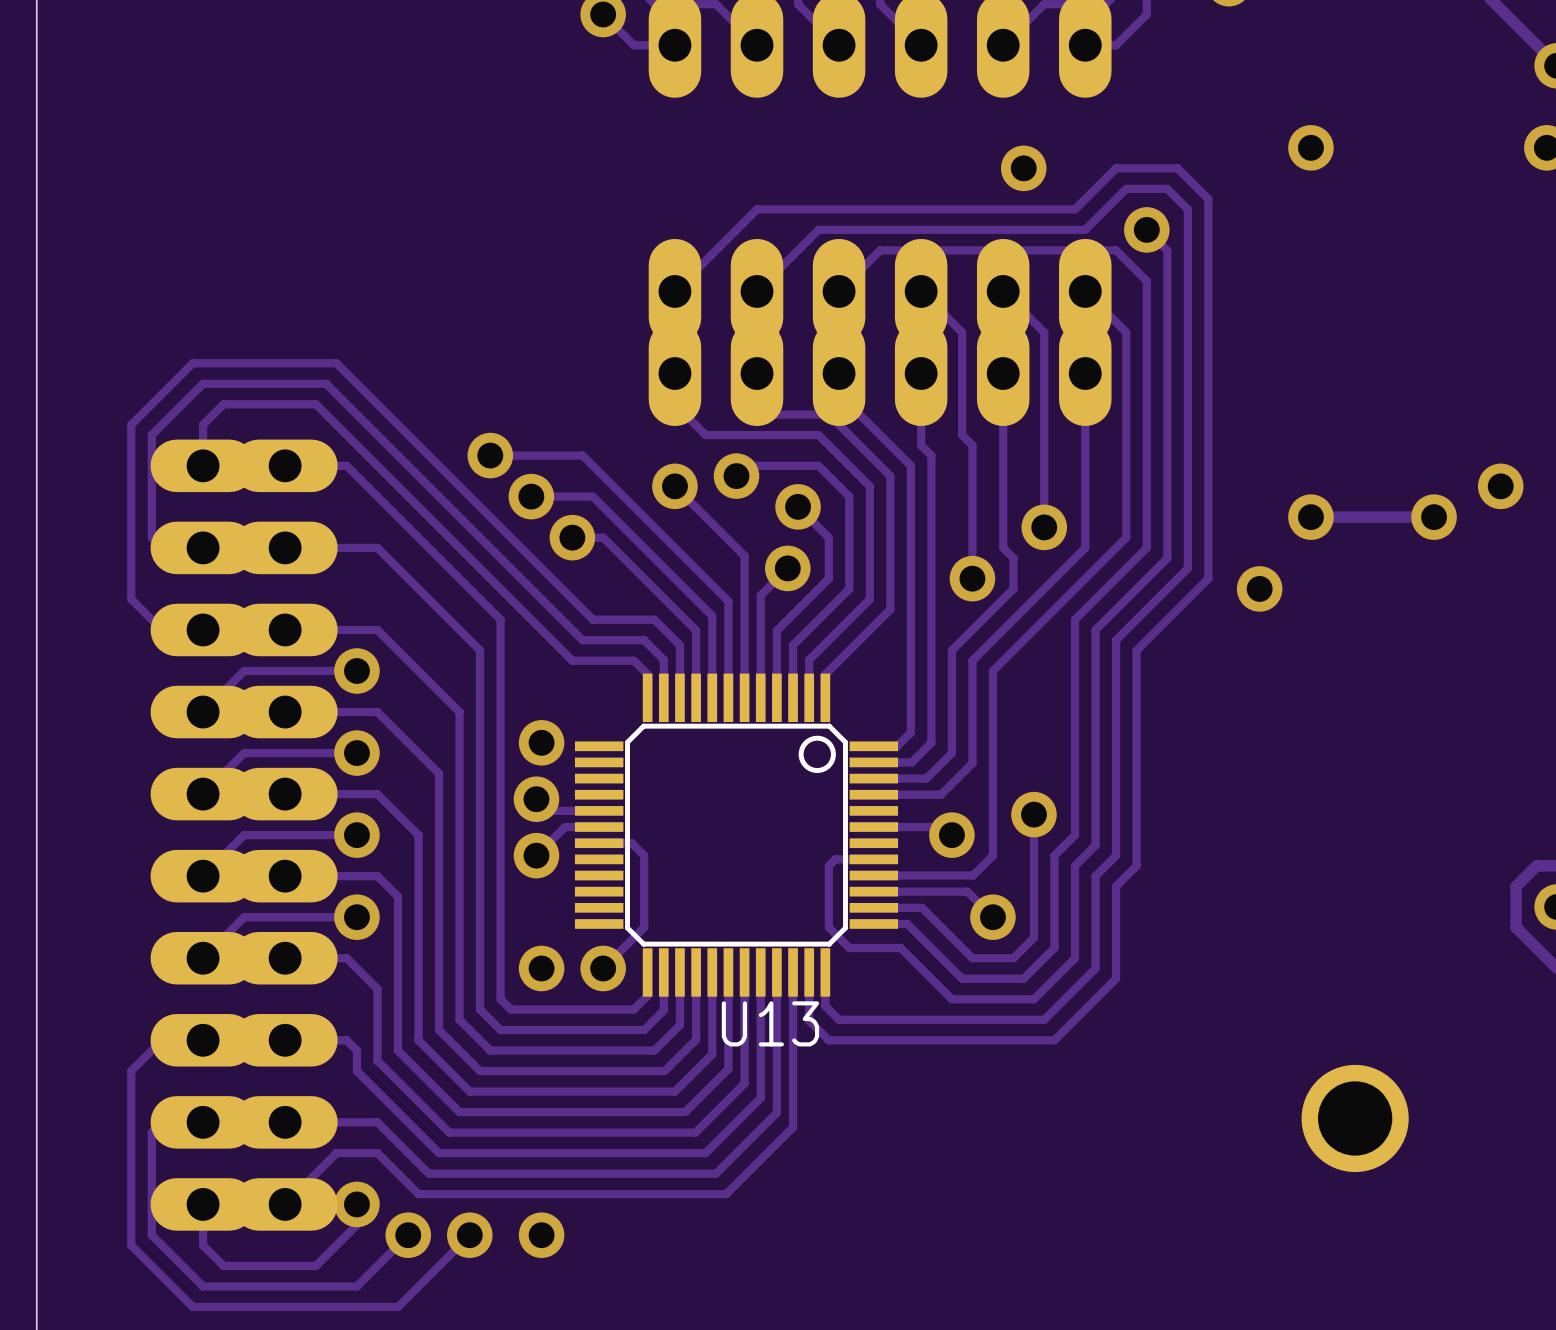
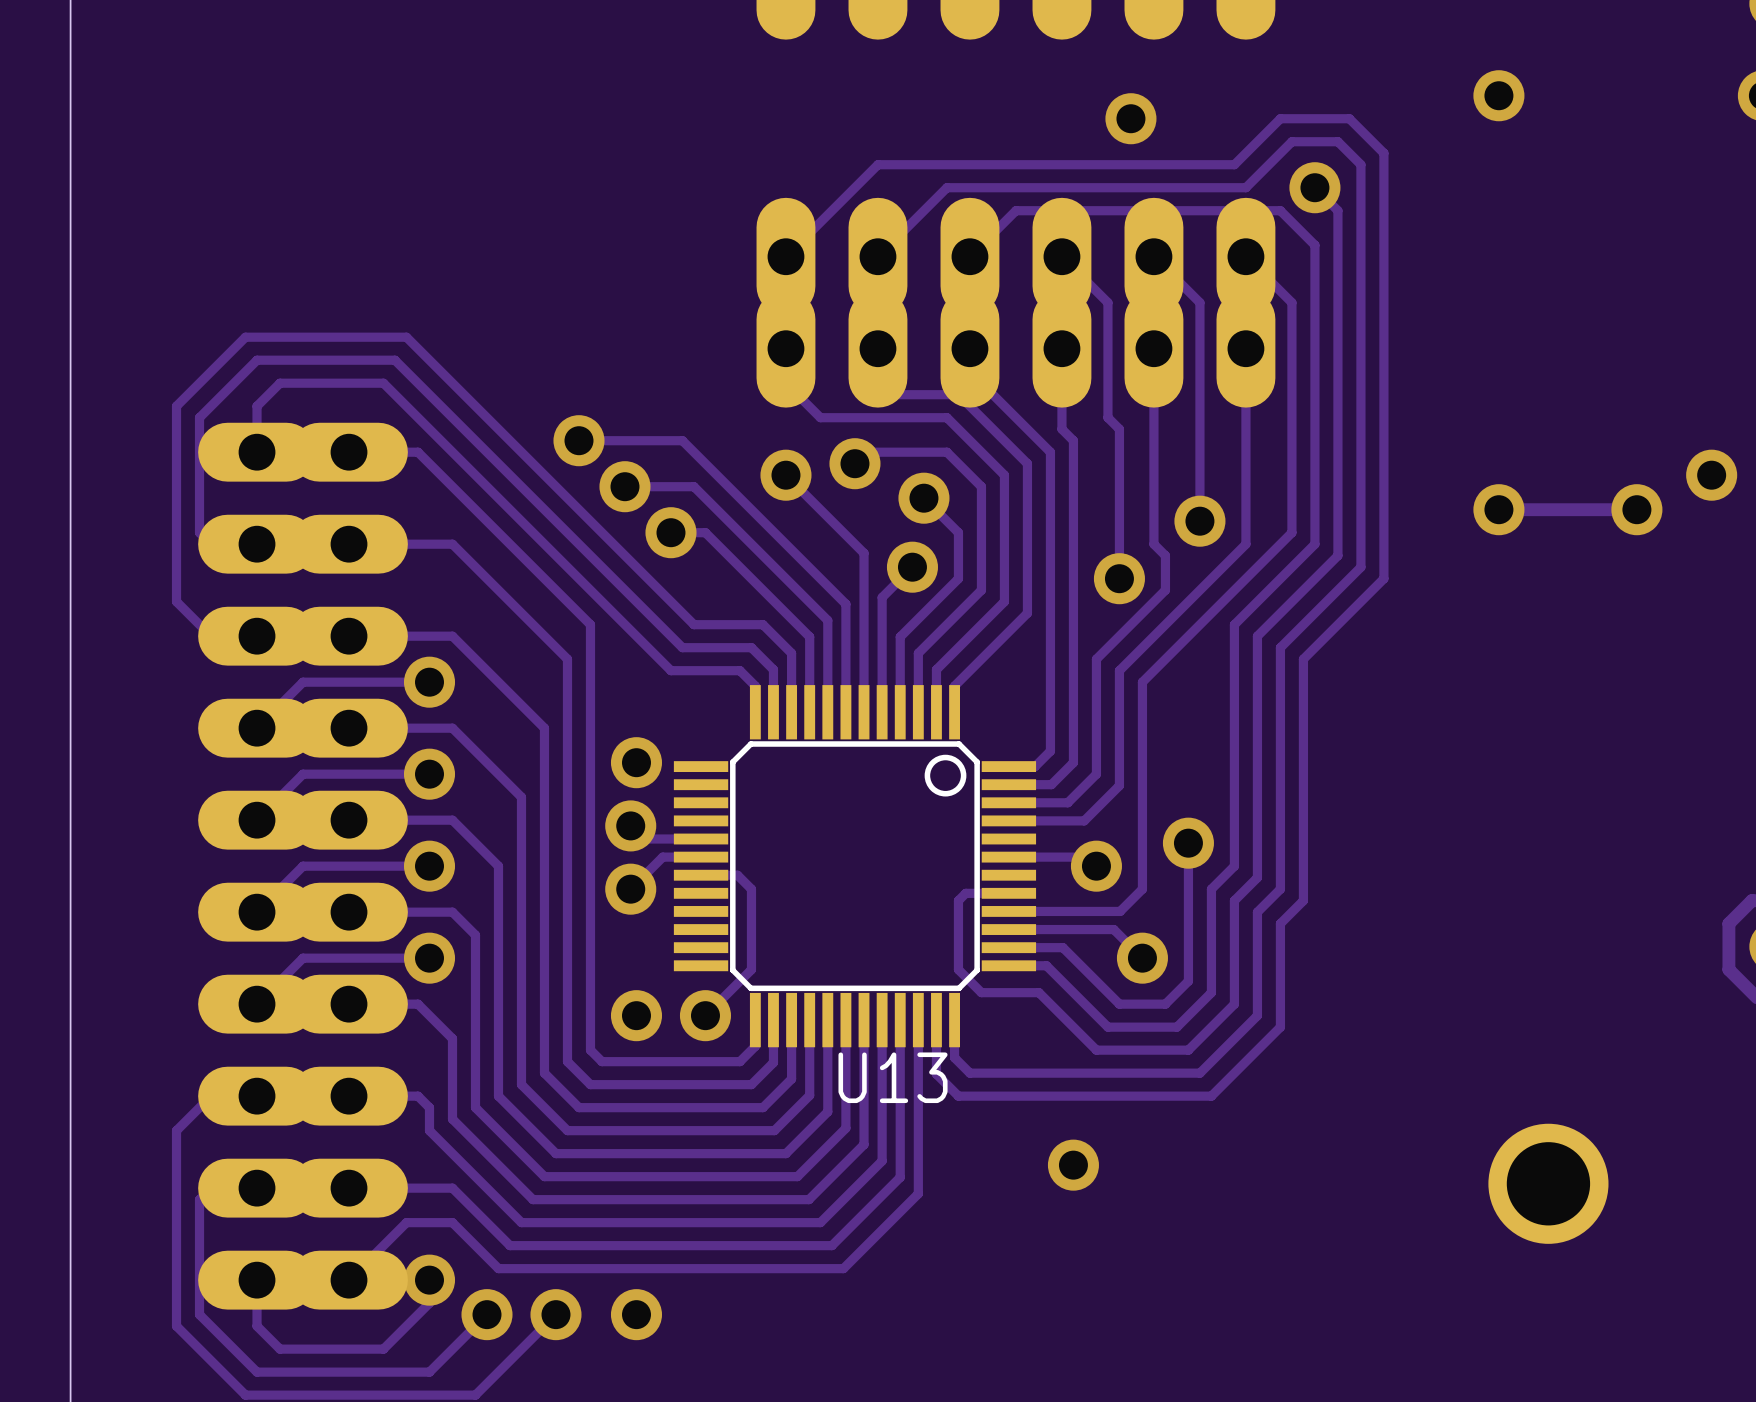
via position: (1023, 168) -> (1130, 118)
via: (1259, 588) -> none
via: none -> (1073, 1165)

